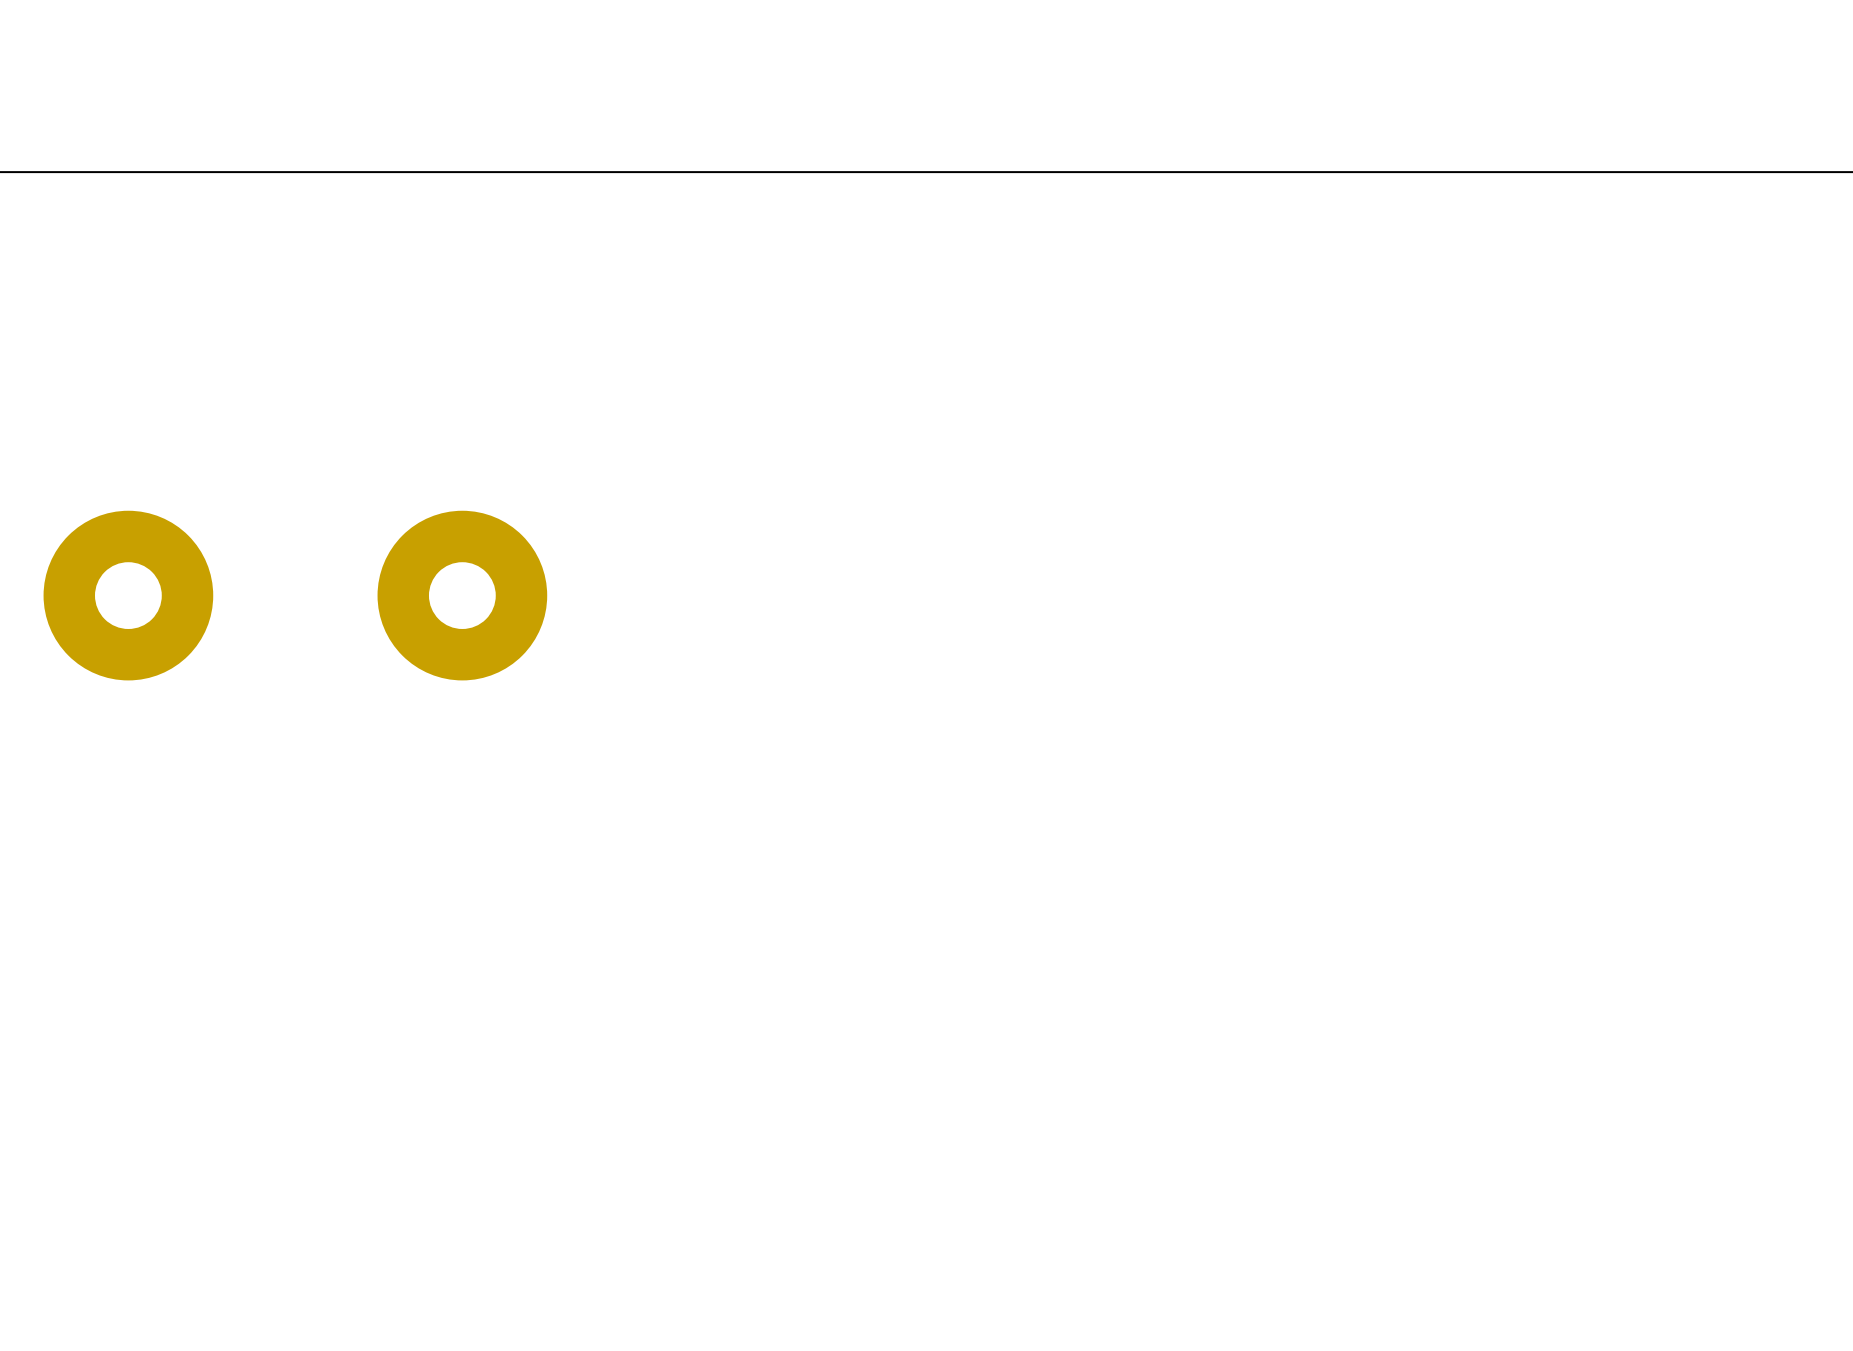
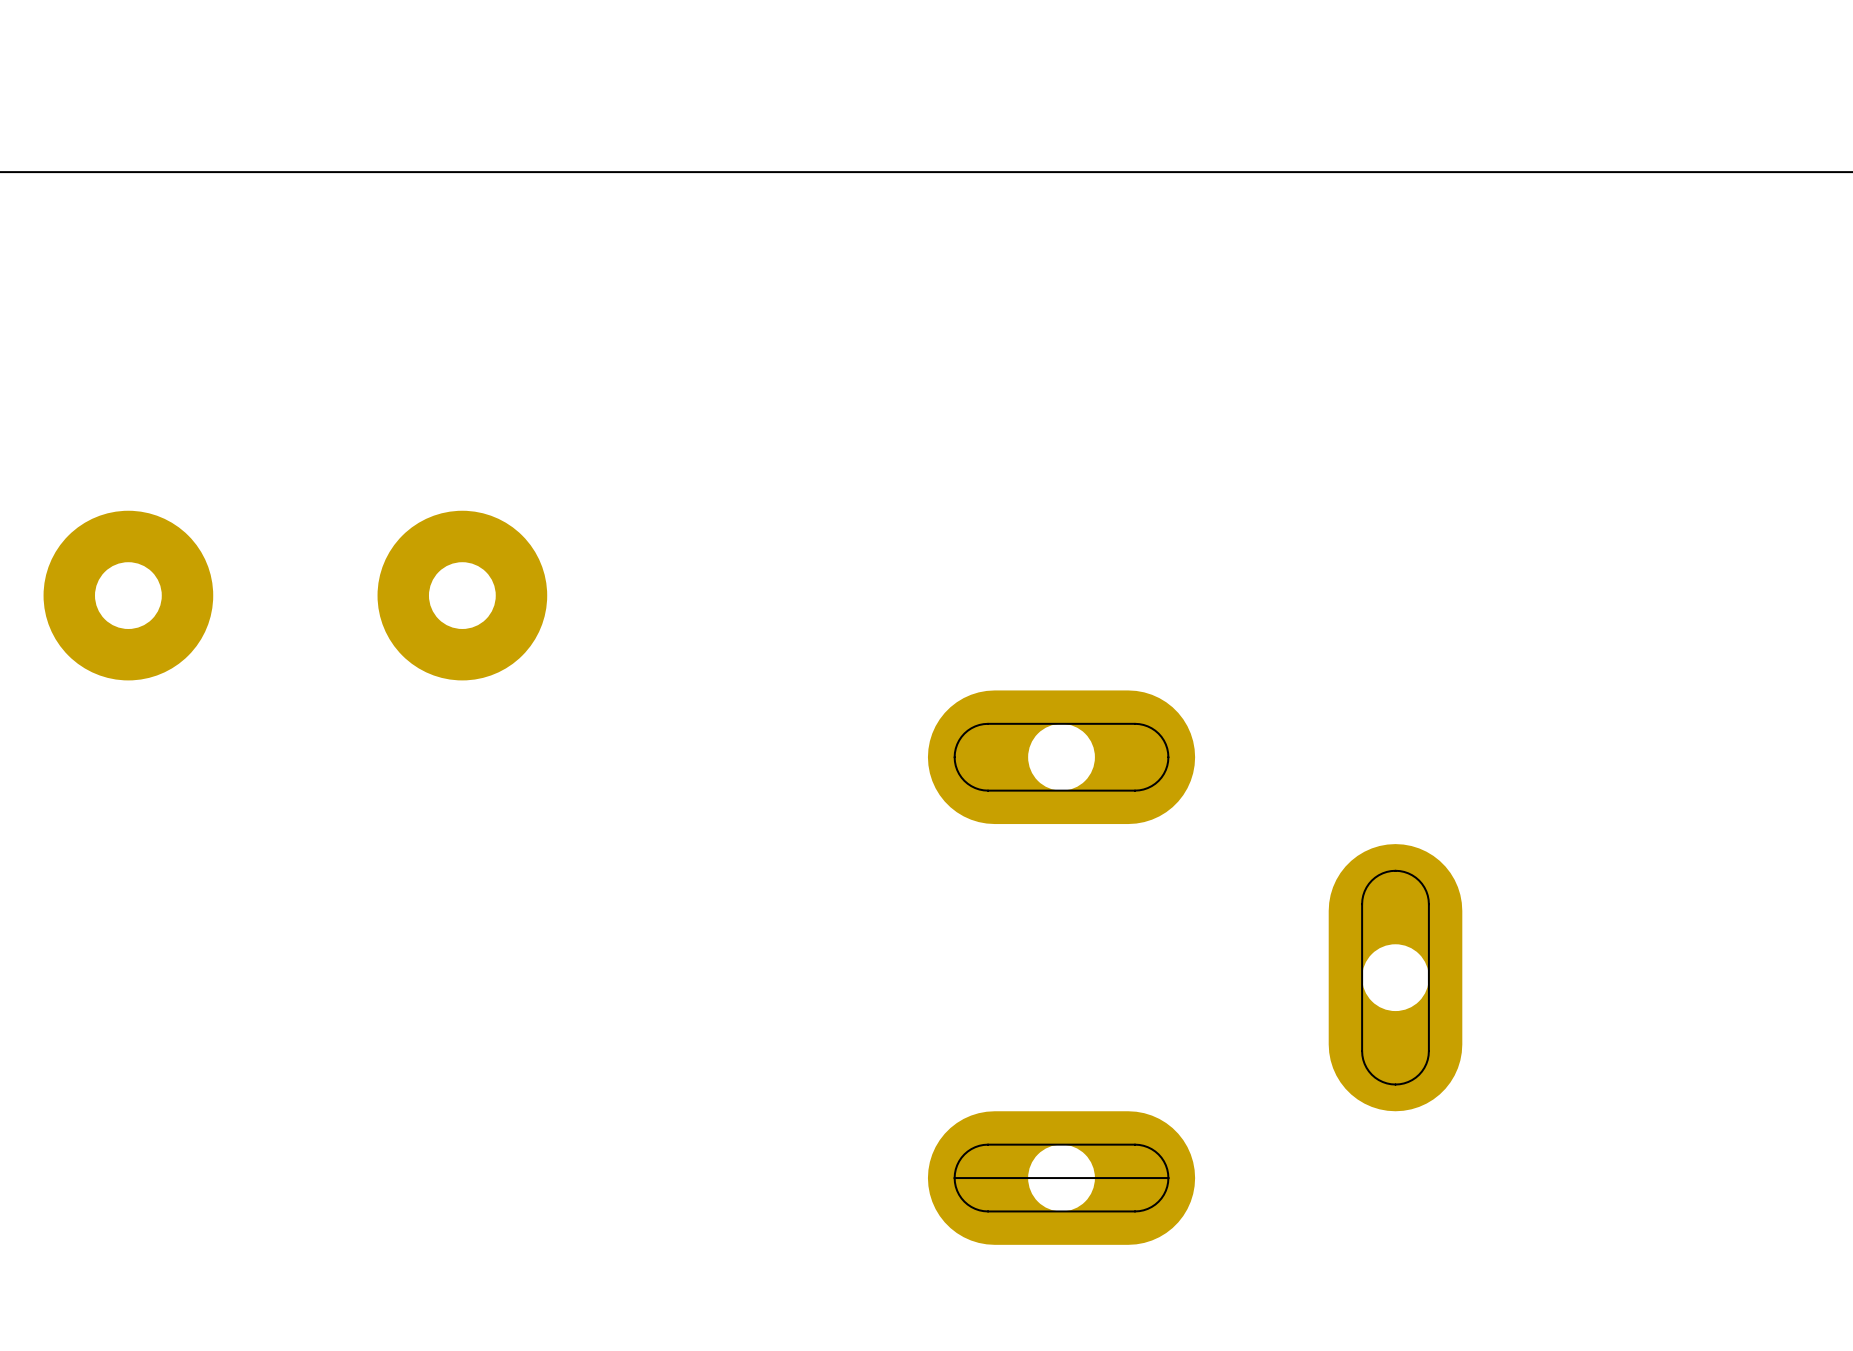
part: none -> (1195, 967)

